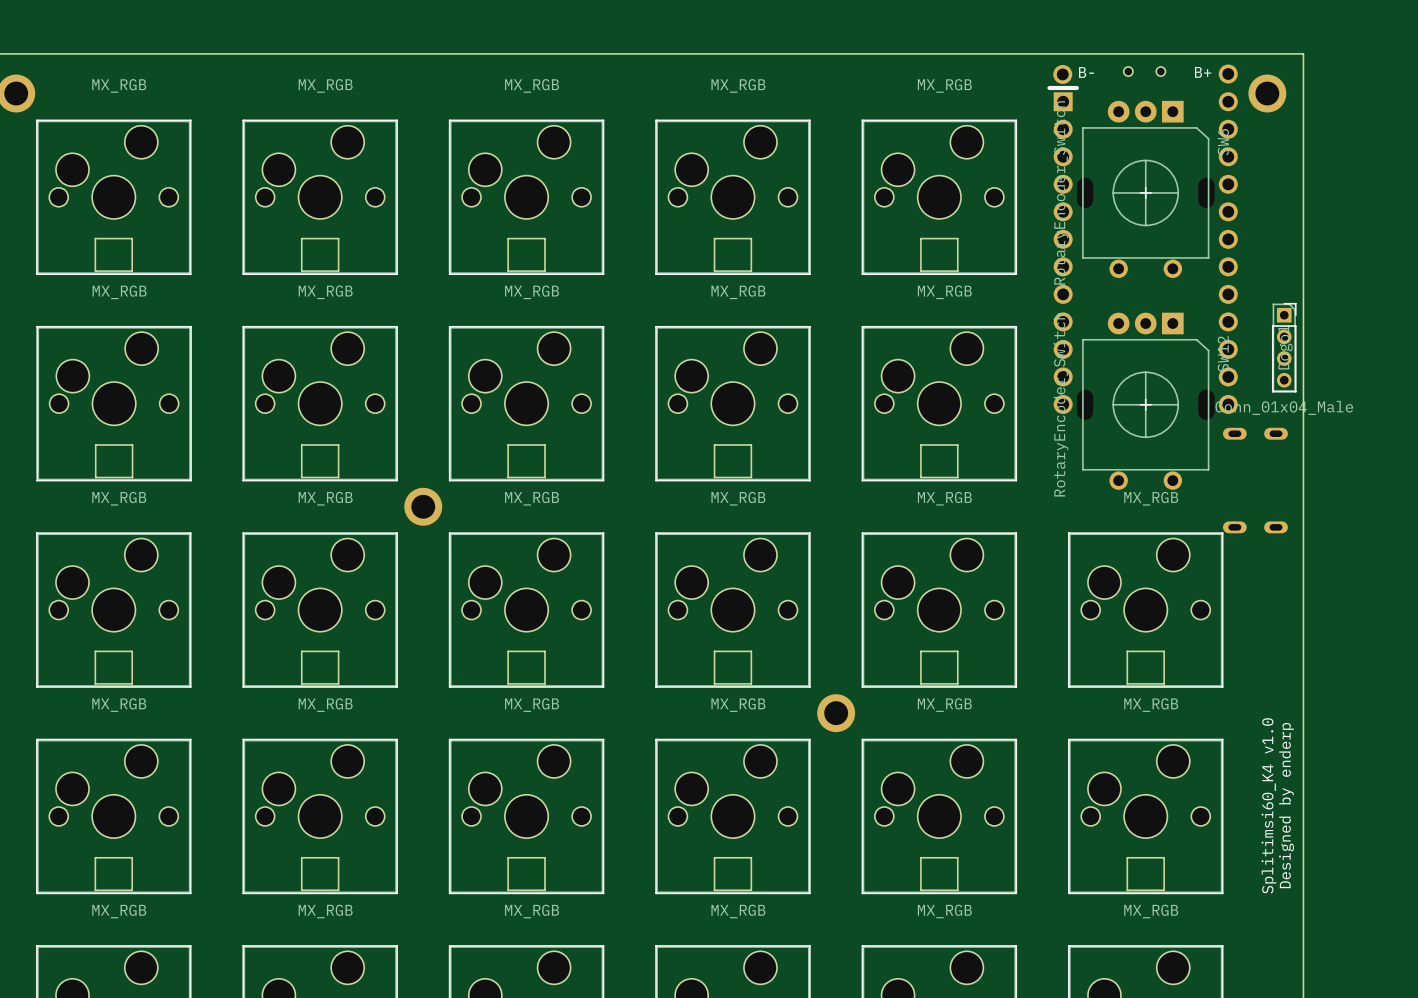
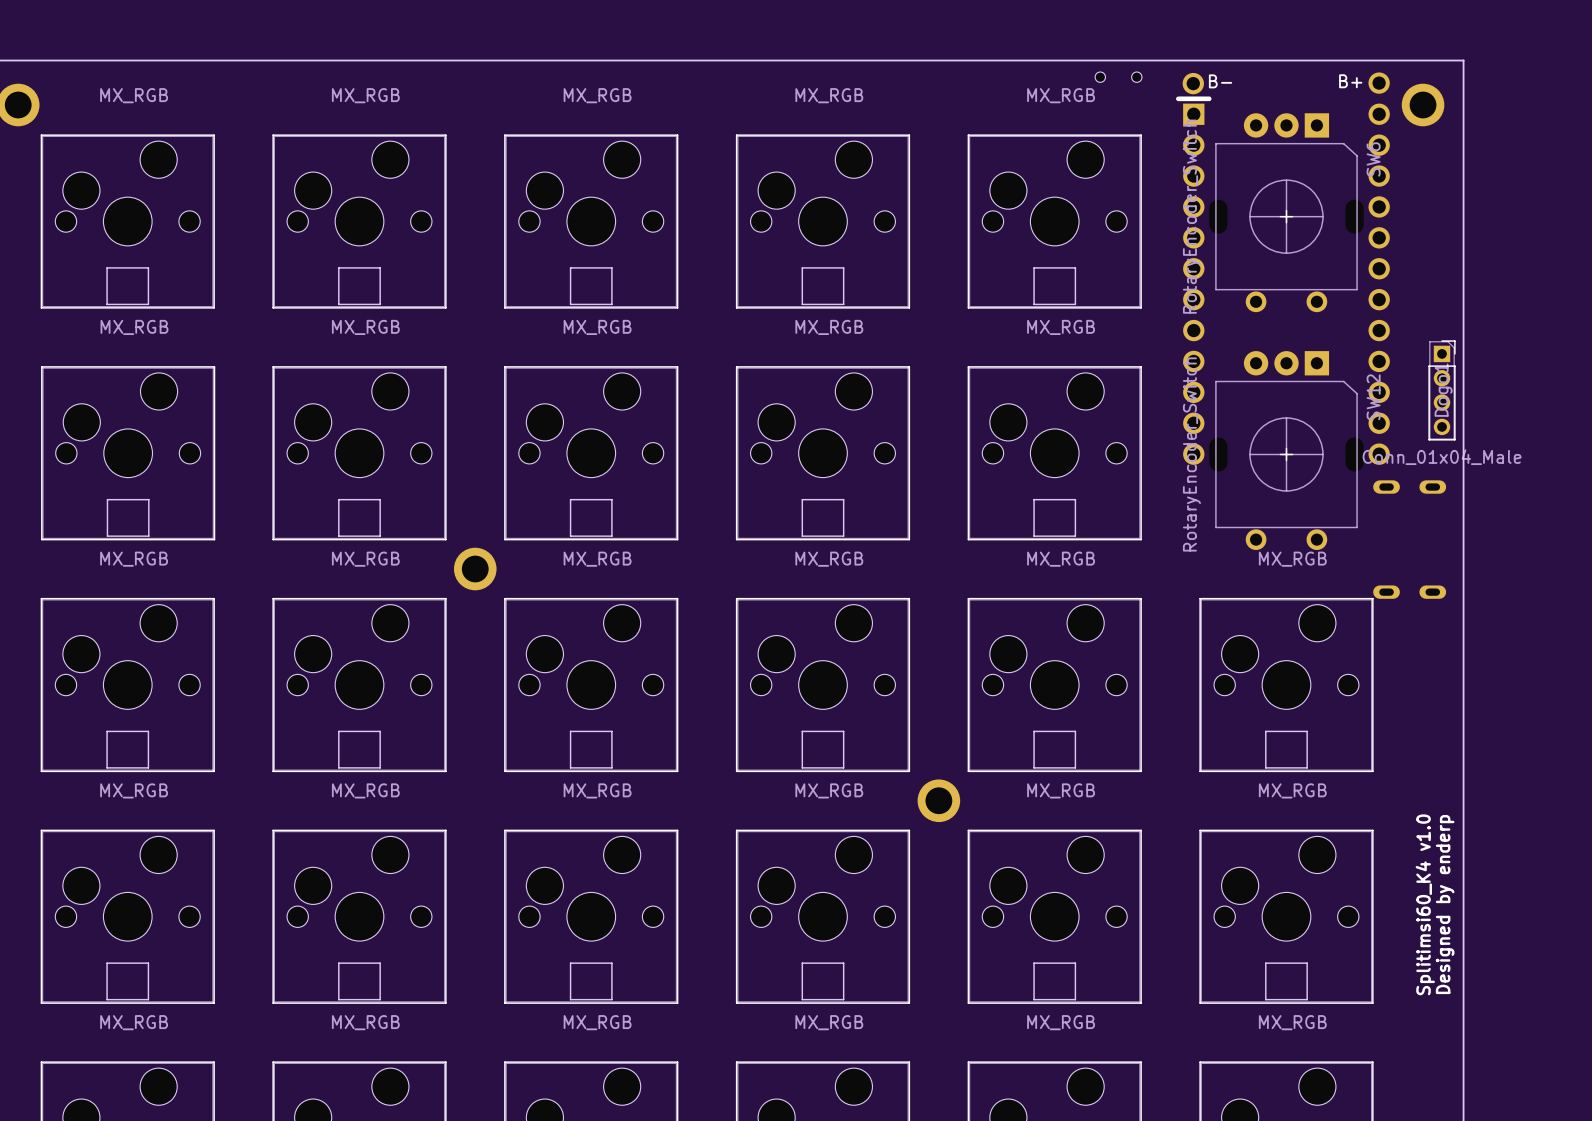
part position: (1144, 71) -> (1118, 77)

